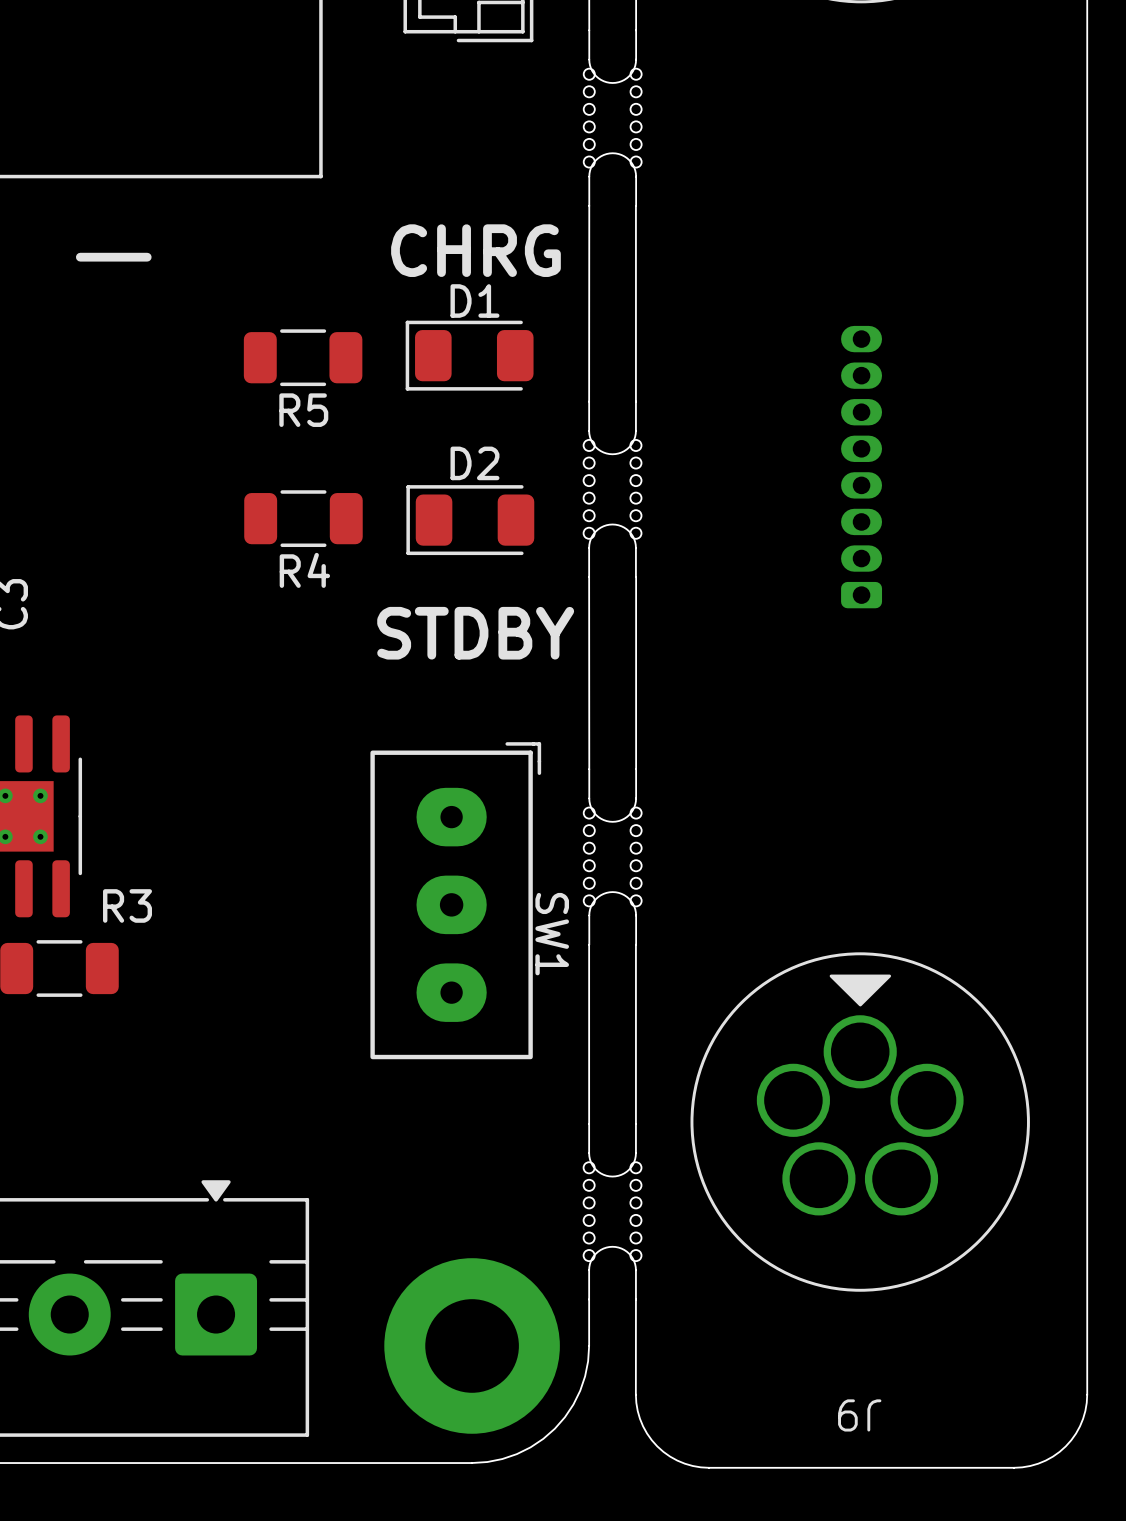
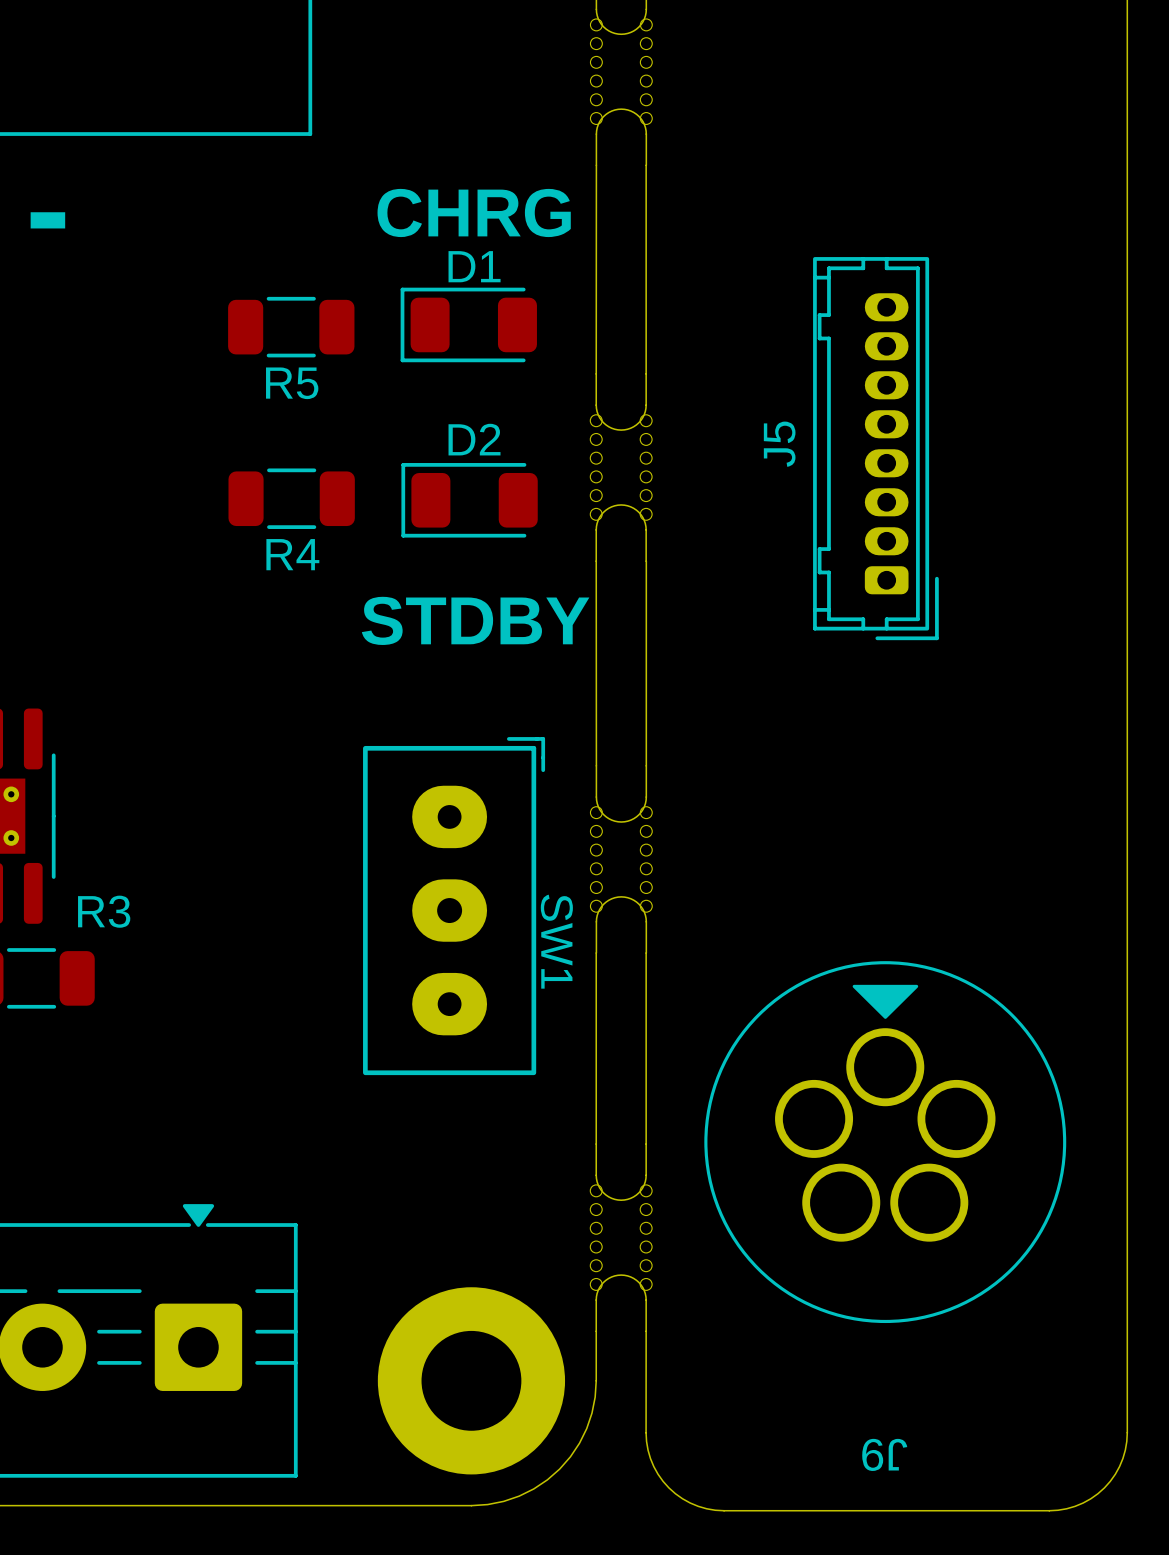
J5 side: bottom (861, 467) -> top (875, 448)

